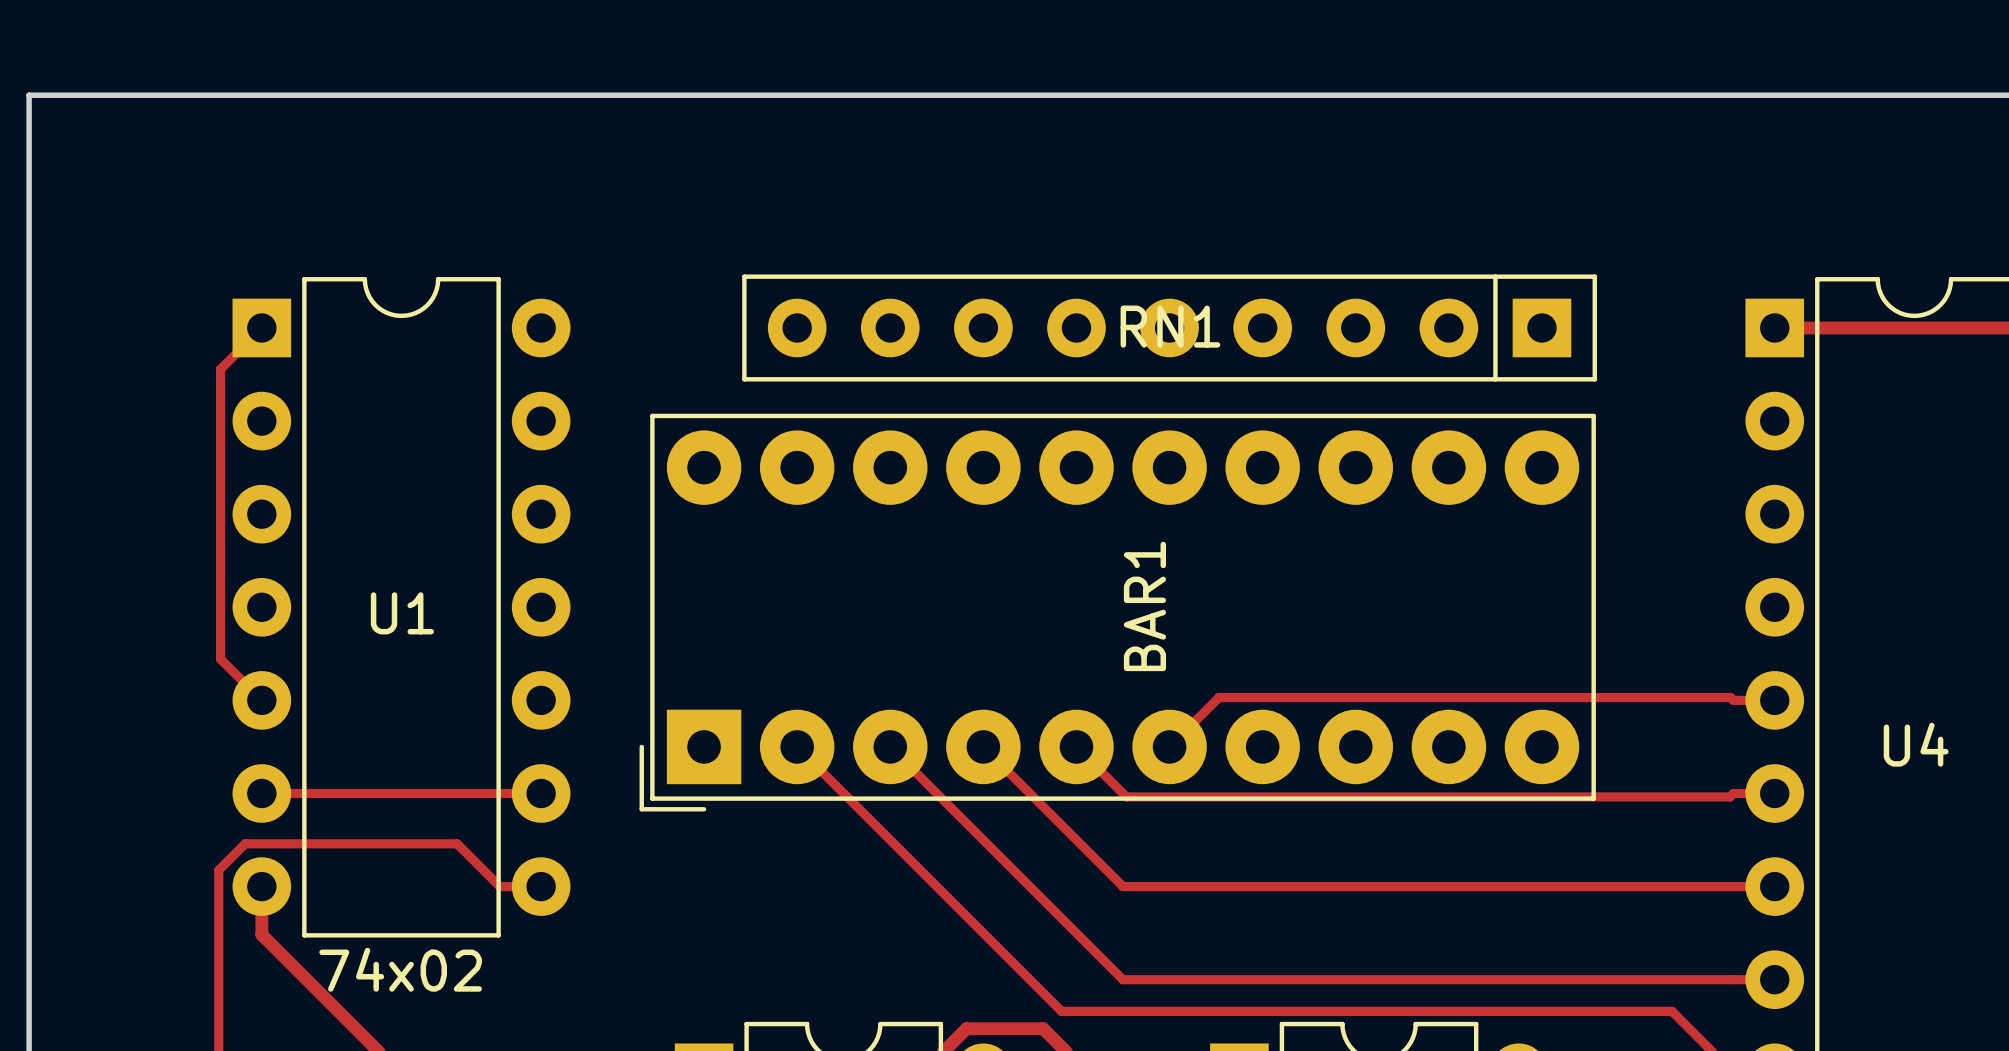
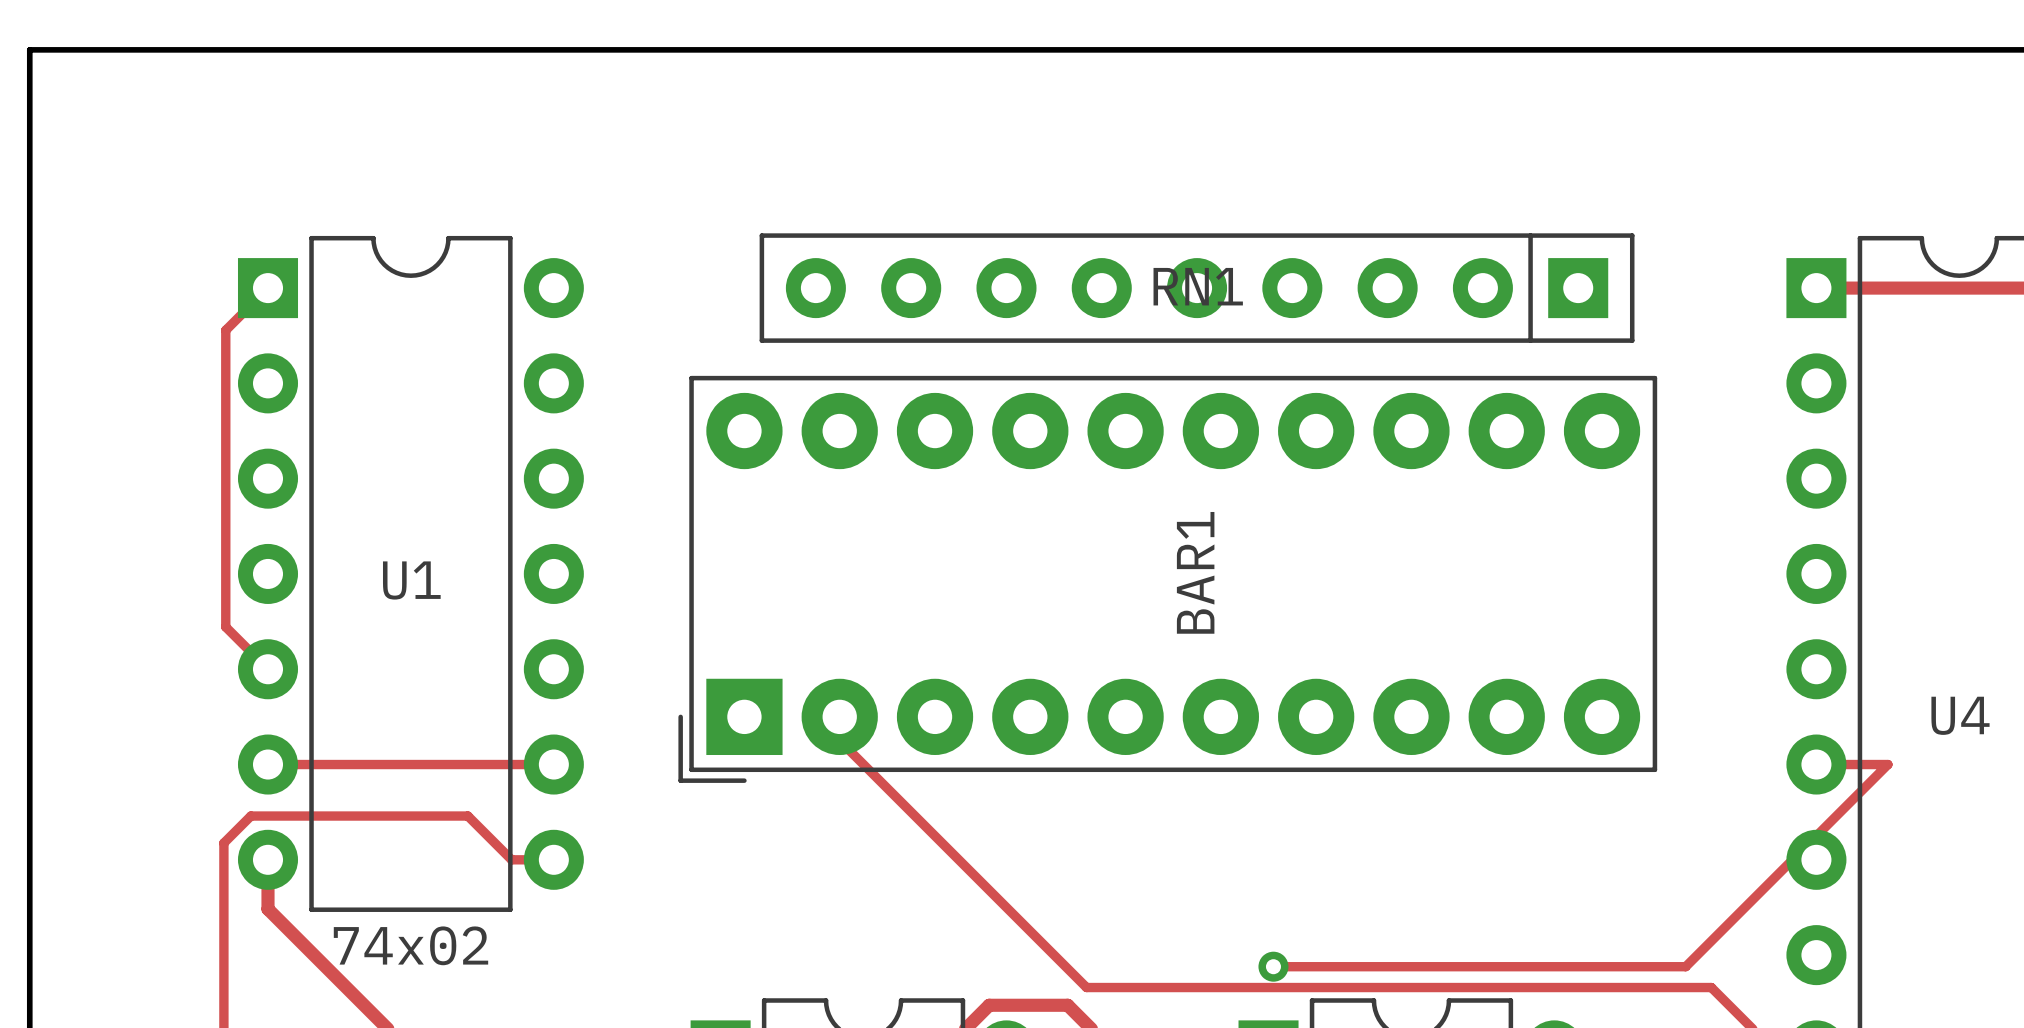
BAR1 position: (1117, 612) -> (1167, 579)
track: (1774, 700) (1733, 700) (1730, 697) (1218, 697) (1169, 746) -> none
track: (890, 746) (1123, 979) (1774, 979) -> none
track: (983, 746) (1123, 886) (1774, 886) -> none
track: (1076, 746) (1126, 796) (1730, 796) (1733, 793) (1774, 793) -> none
track: none -> (1843, 764) (1887, 764) (1685, 966) (1273, 966)
via: none -> (1273, 966)

